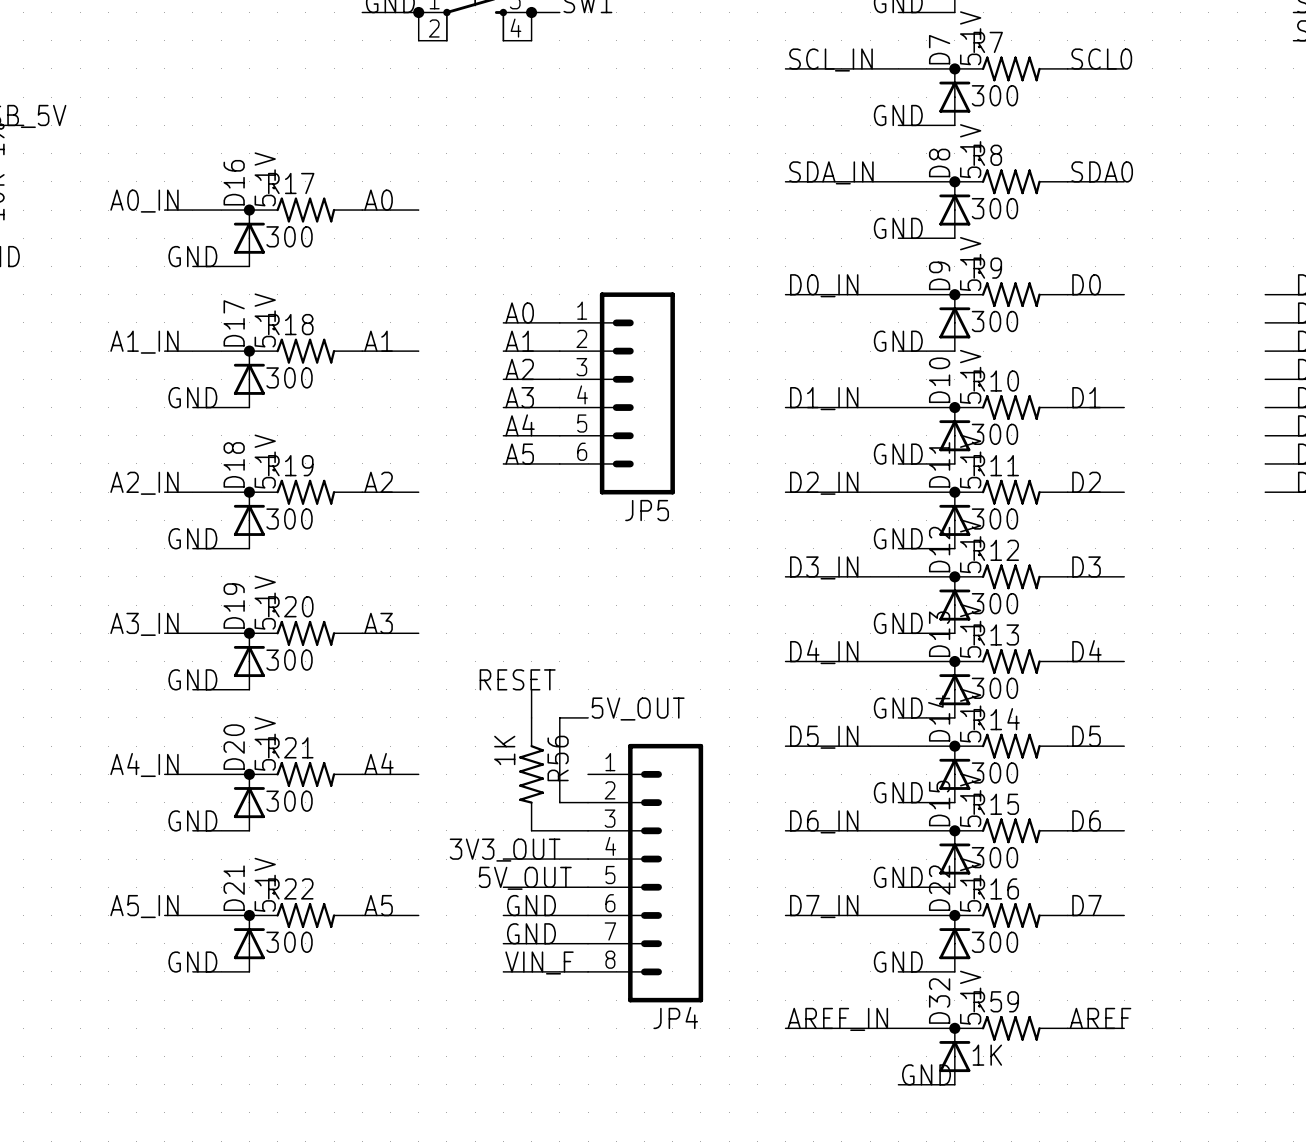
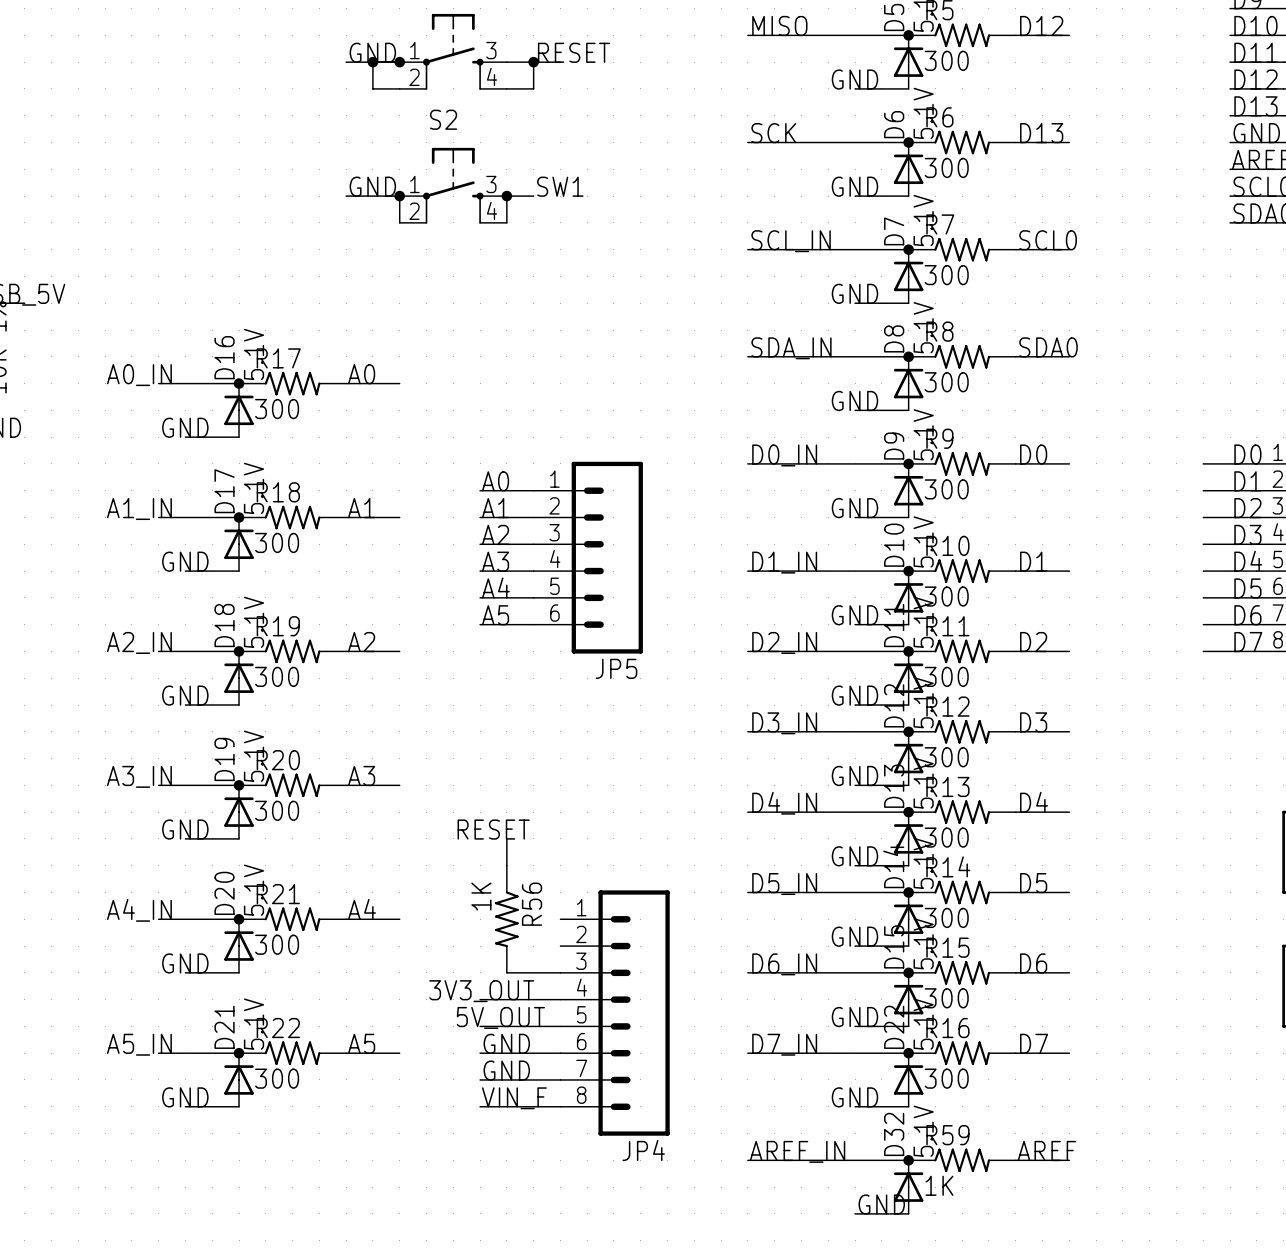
label: 5V_OUT (638, 709) -> none
wire: (588, 717) (559, 717) (559, 802) (588, 802) -> none

